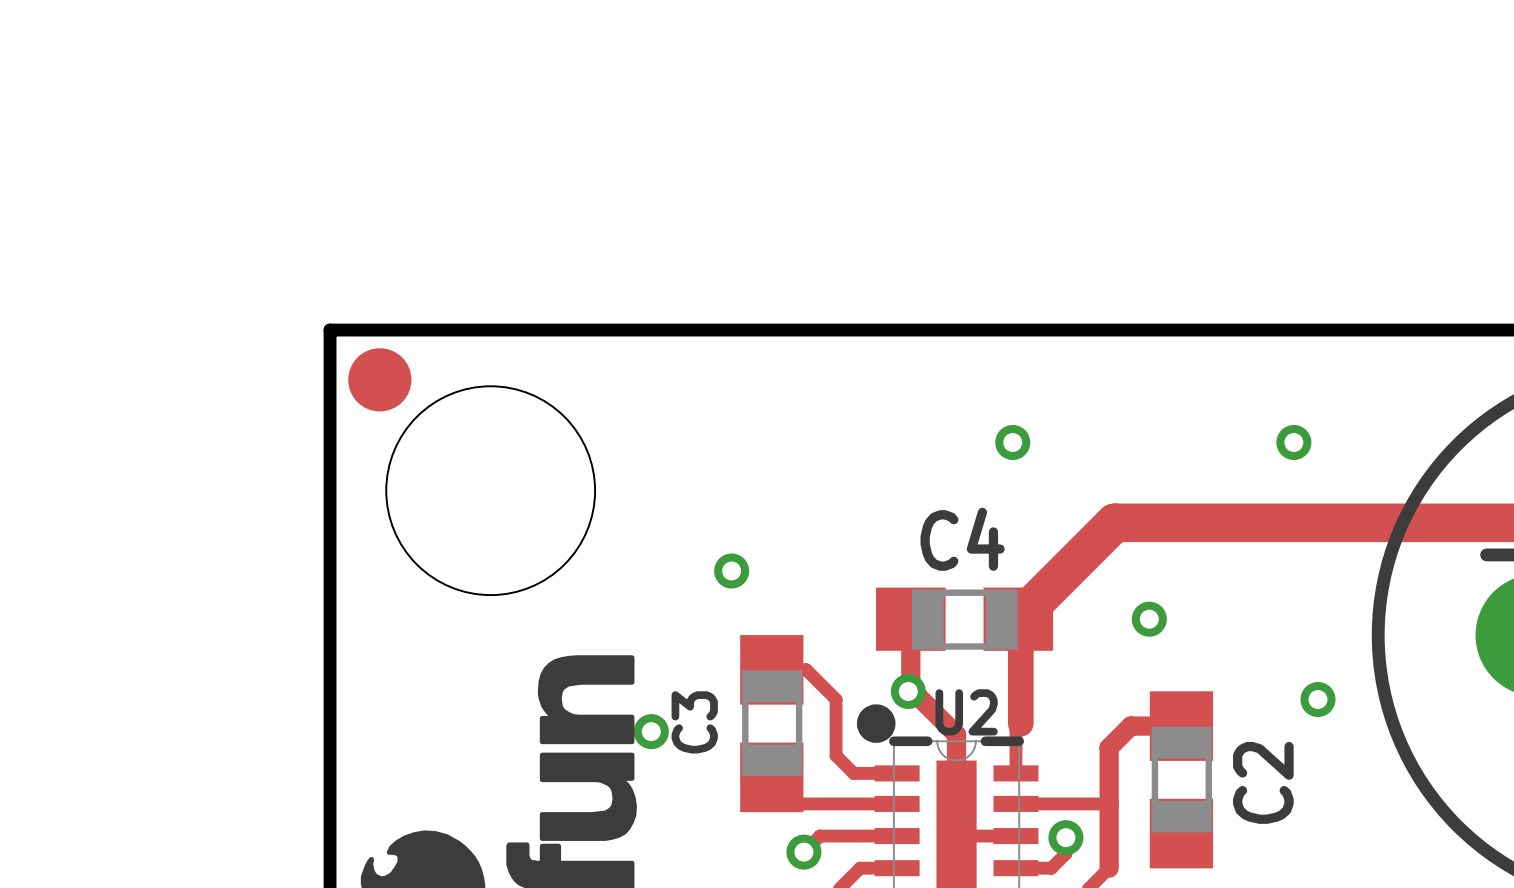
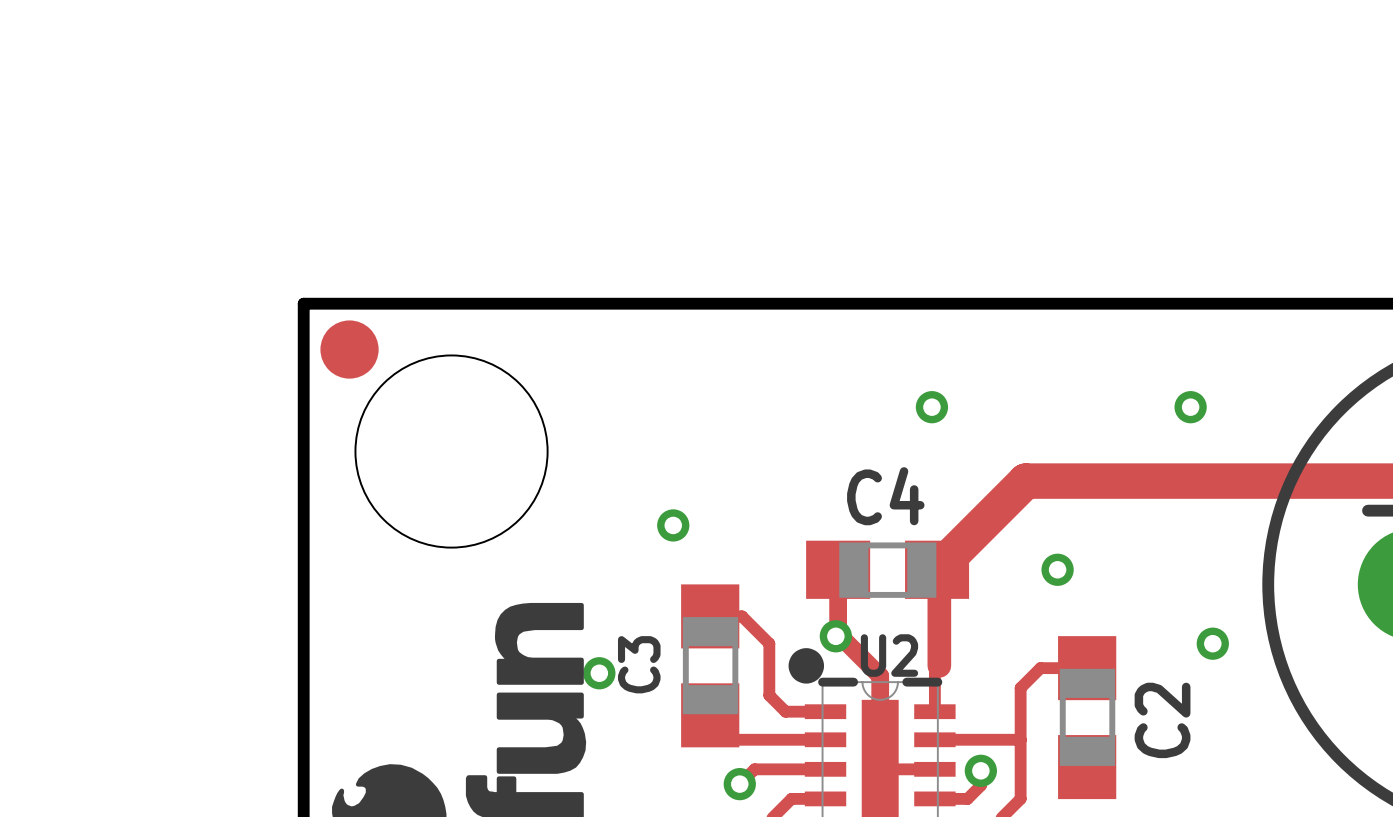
track width: thick (1181, 726) (1130, 726) (1109, 747) (1109, 868) -> thin (1087, 668) (1040, 668) (1020, 688) (1020, 798)

